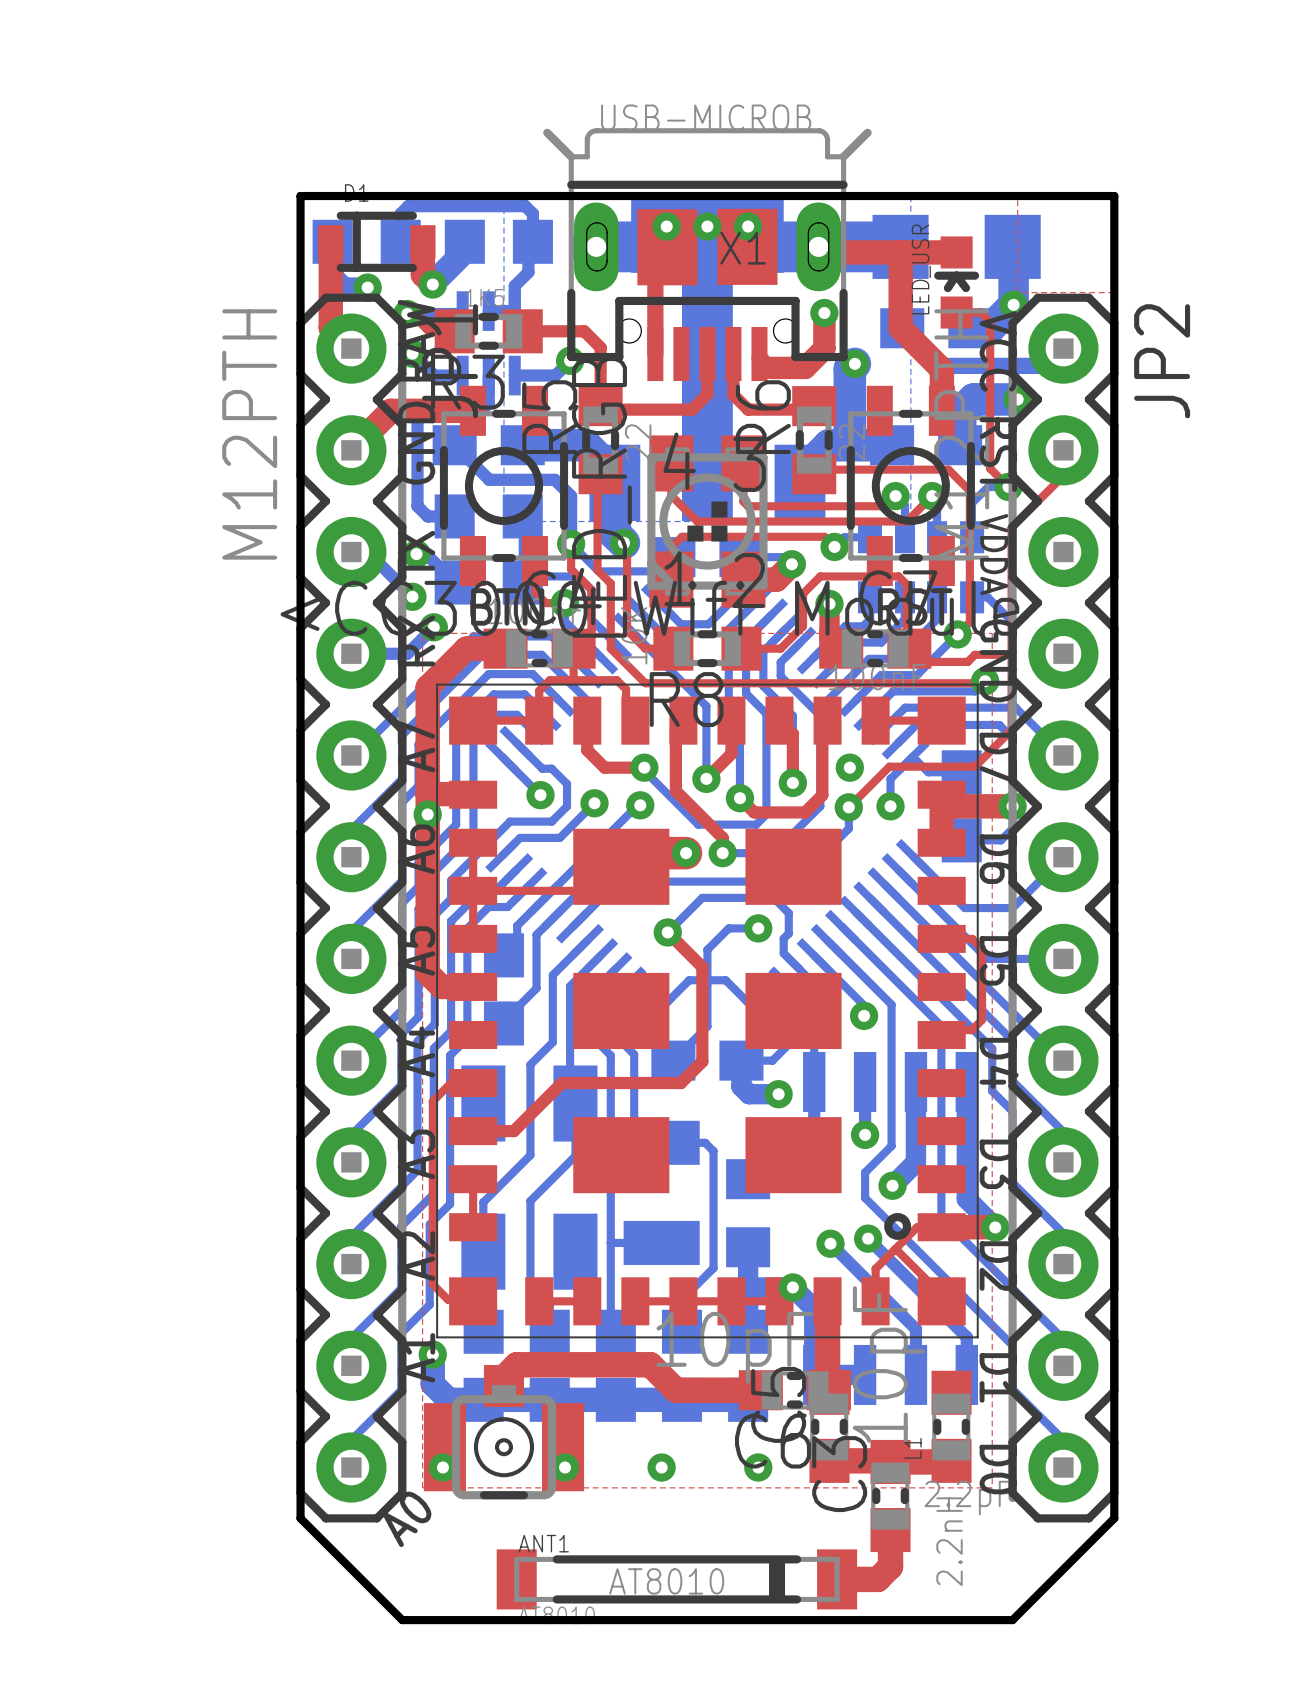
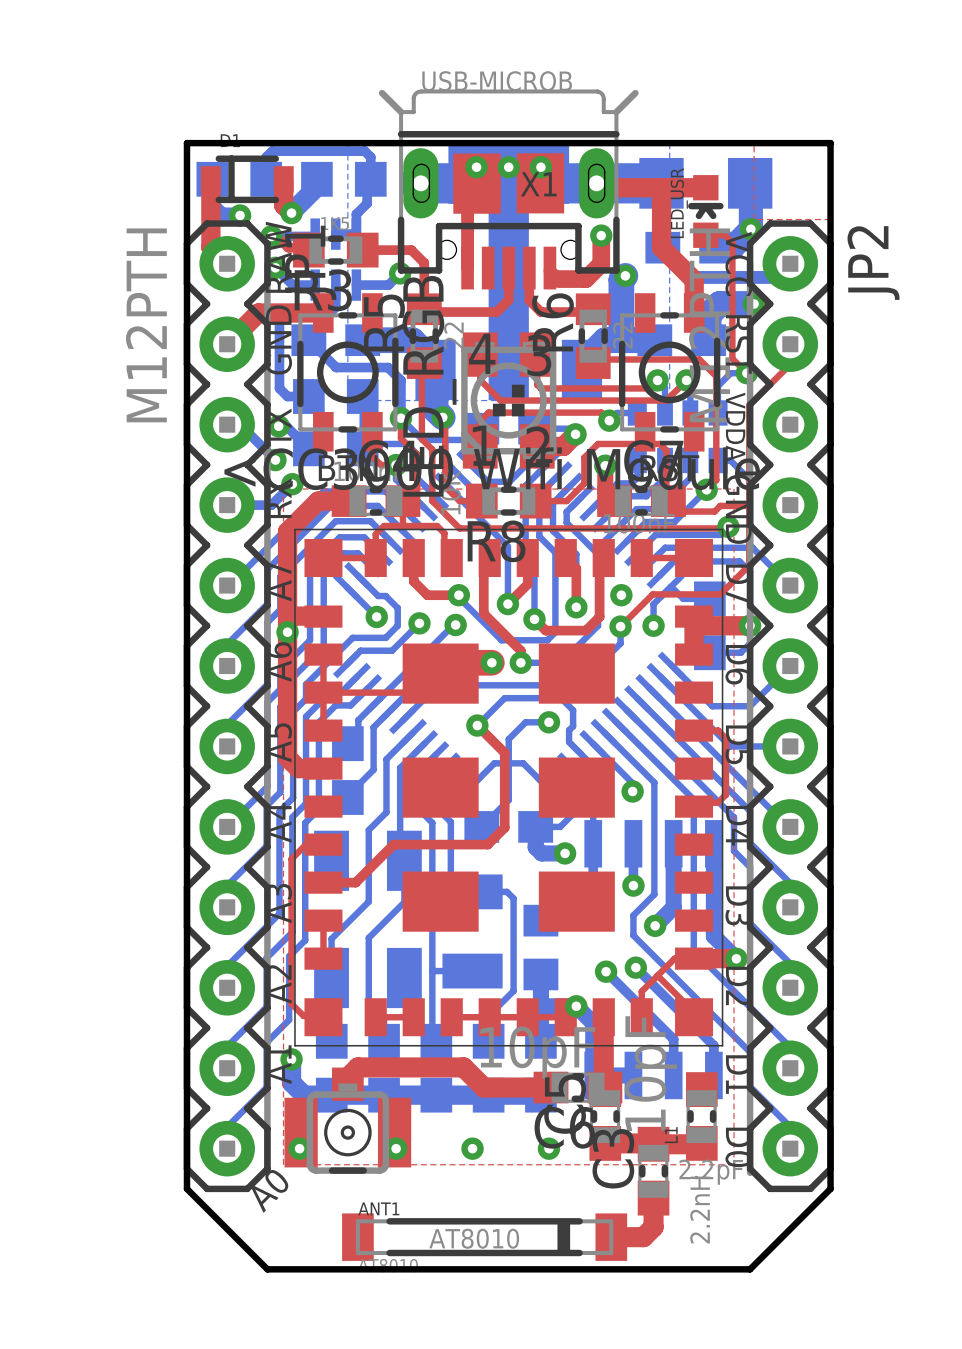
drawing: [884, 1212, 912, 1240] -> none

